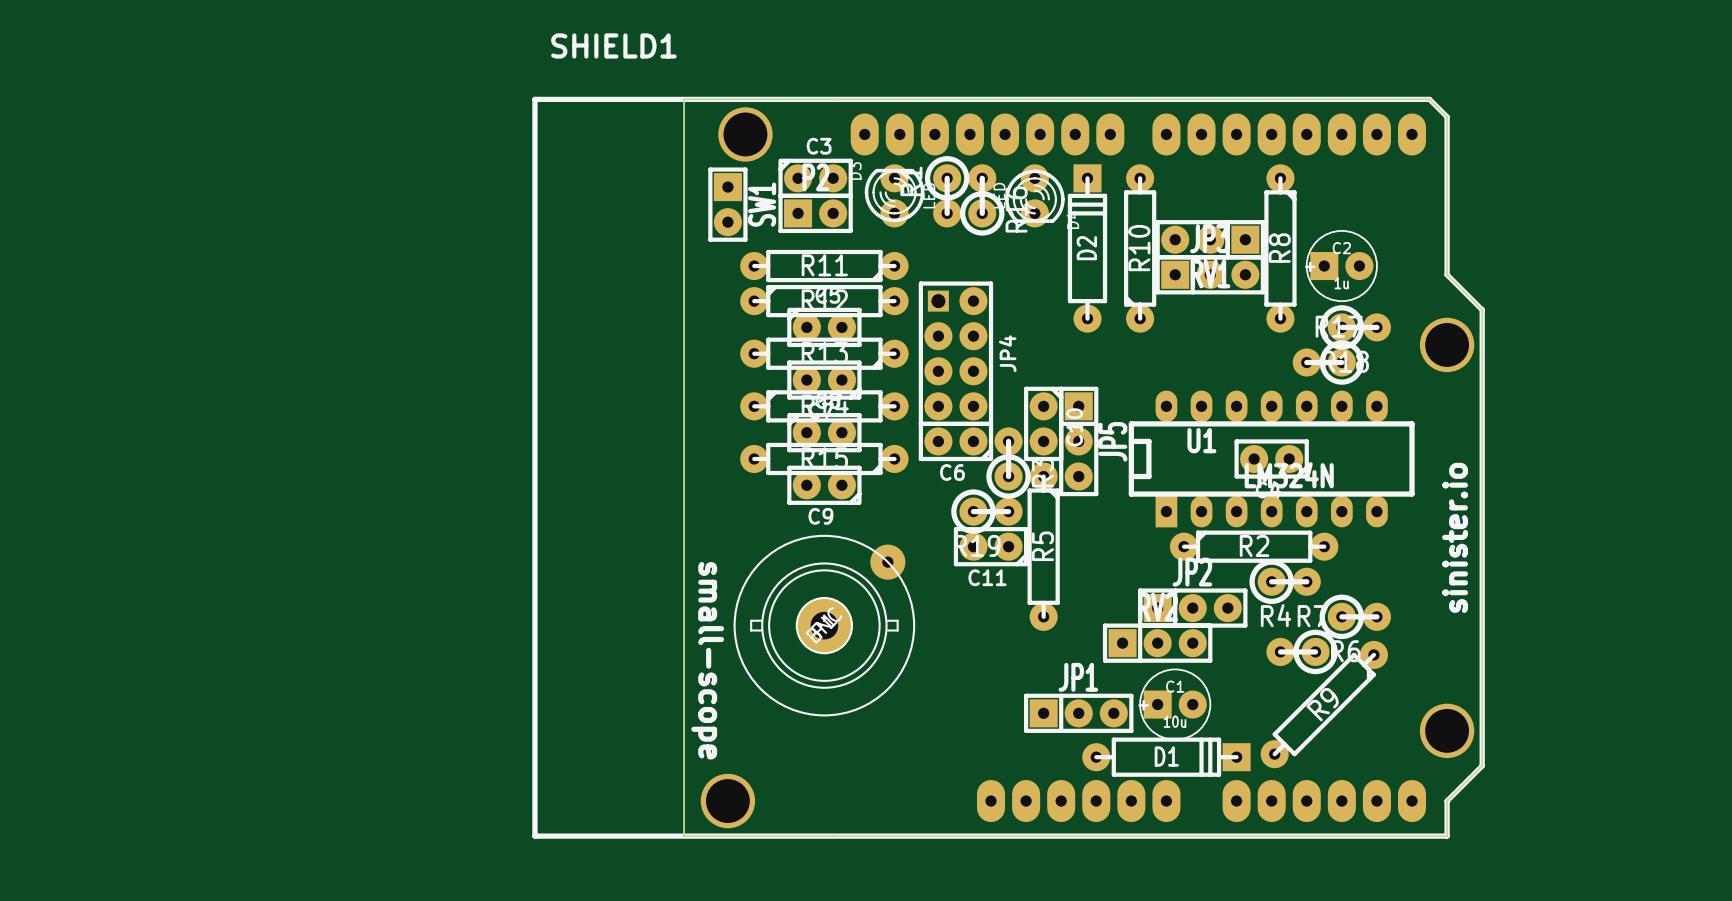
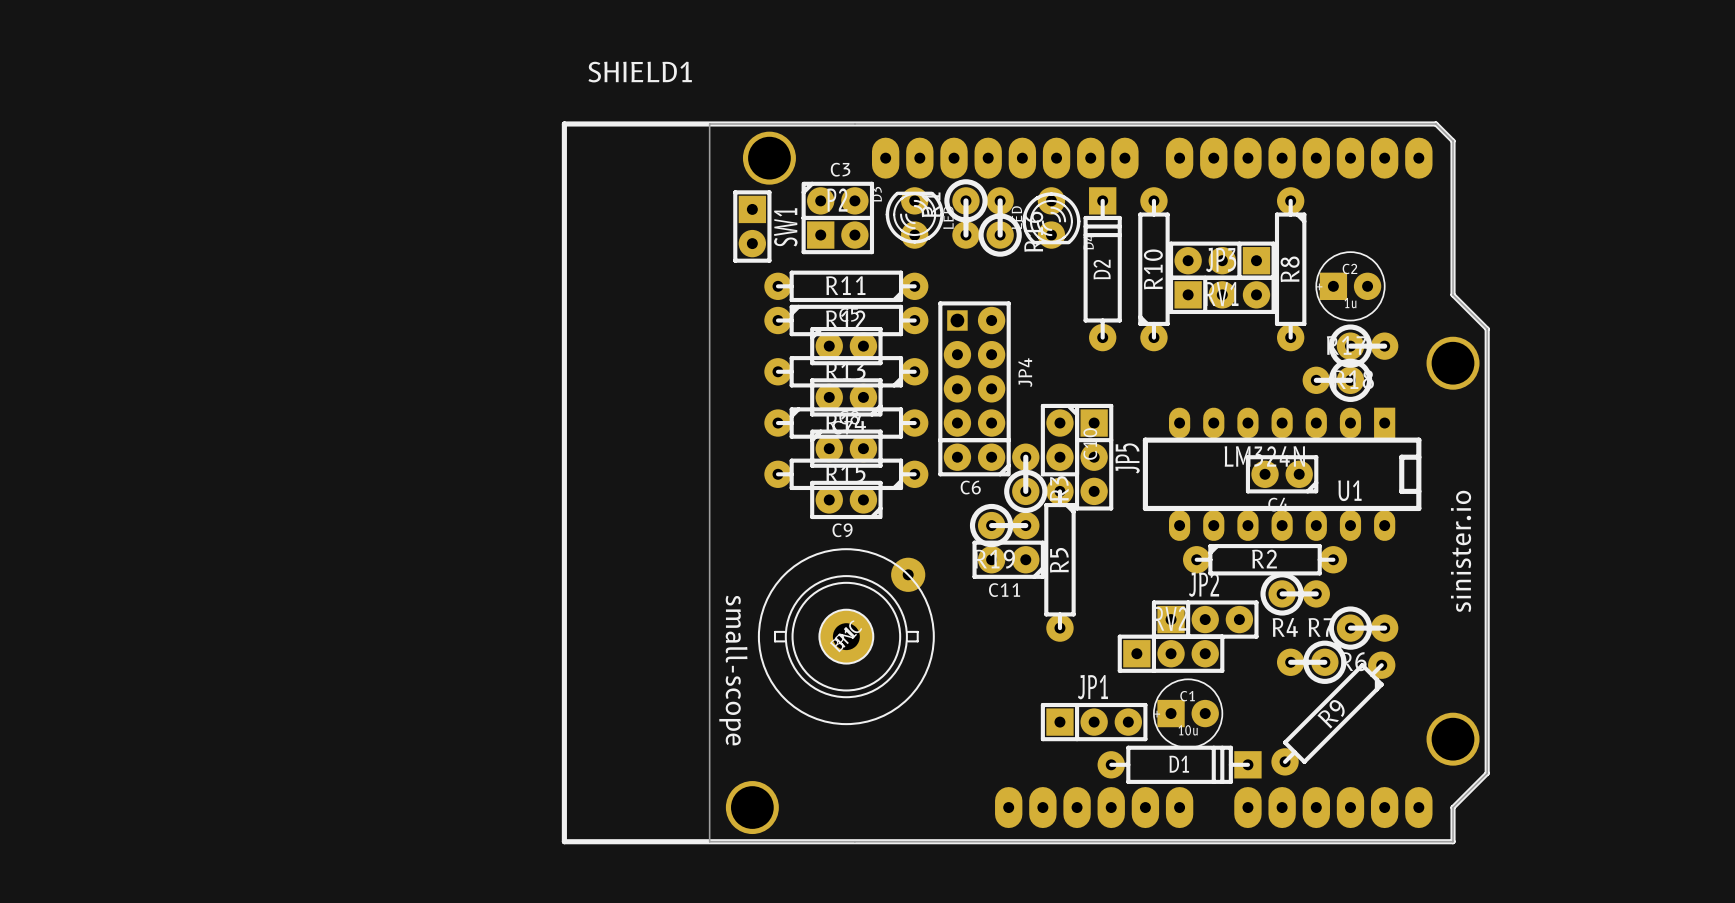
U1 rotation: 0° (1271, 458) -> 180° (1282, 474)

